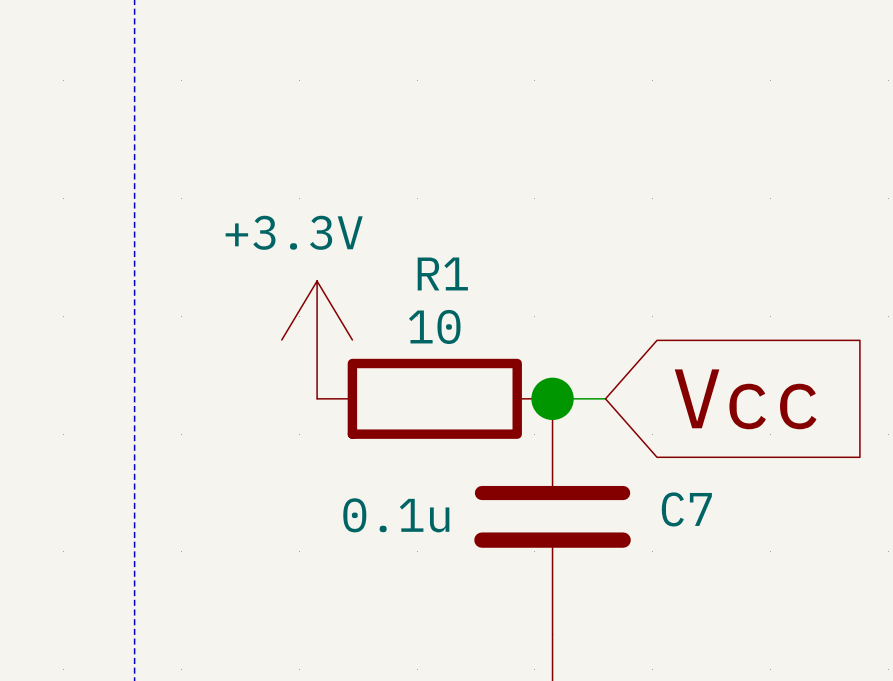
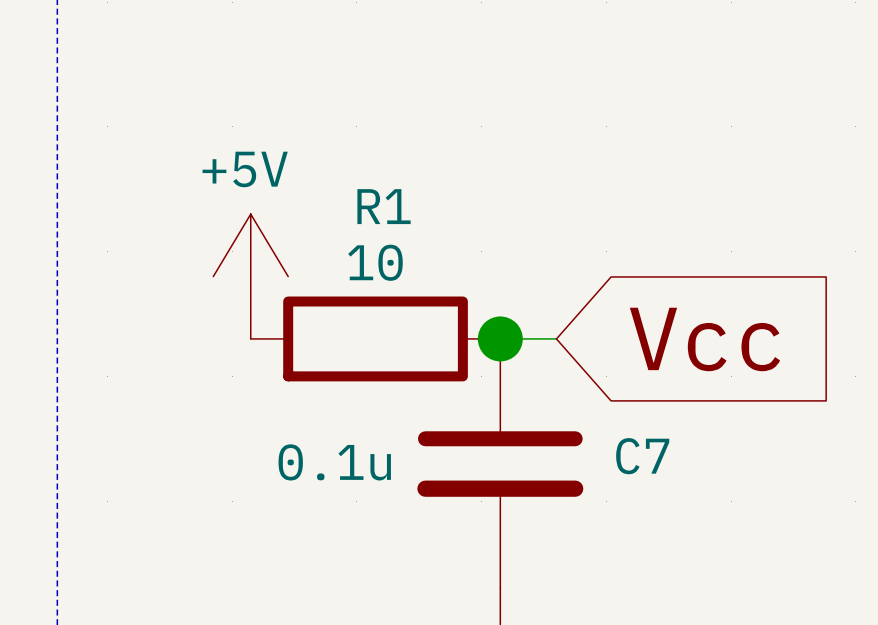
power symbol: +3.3V (317, 339) -> +5V (250, 276)

